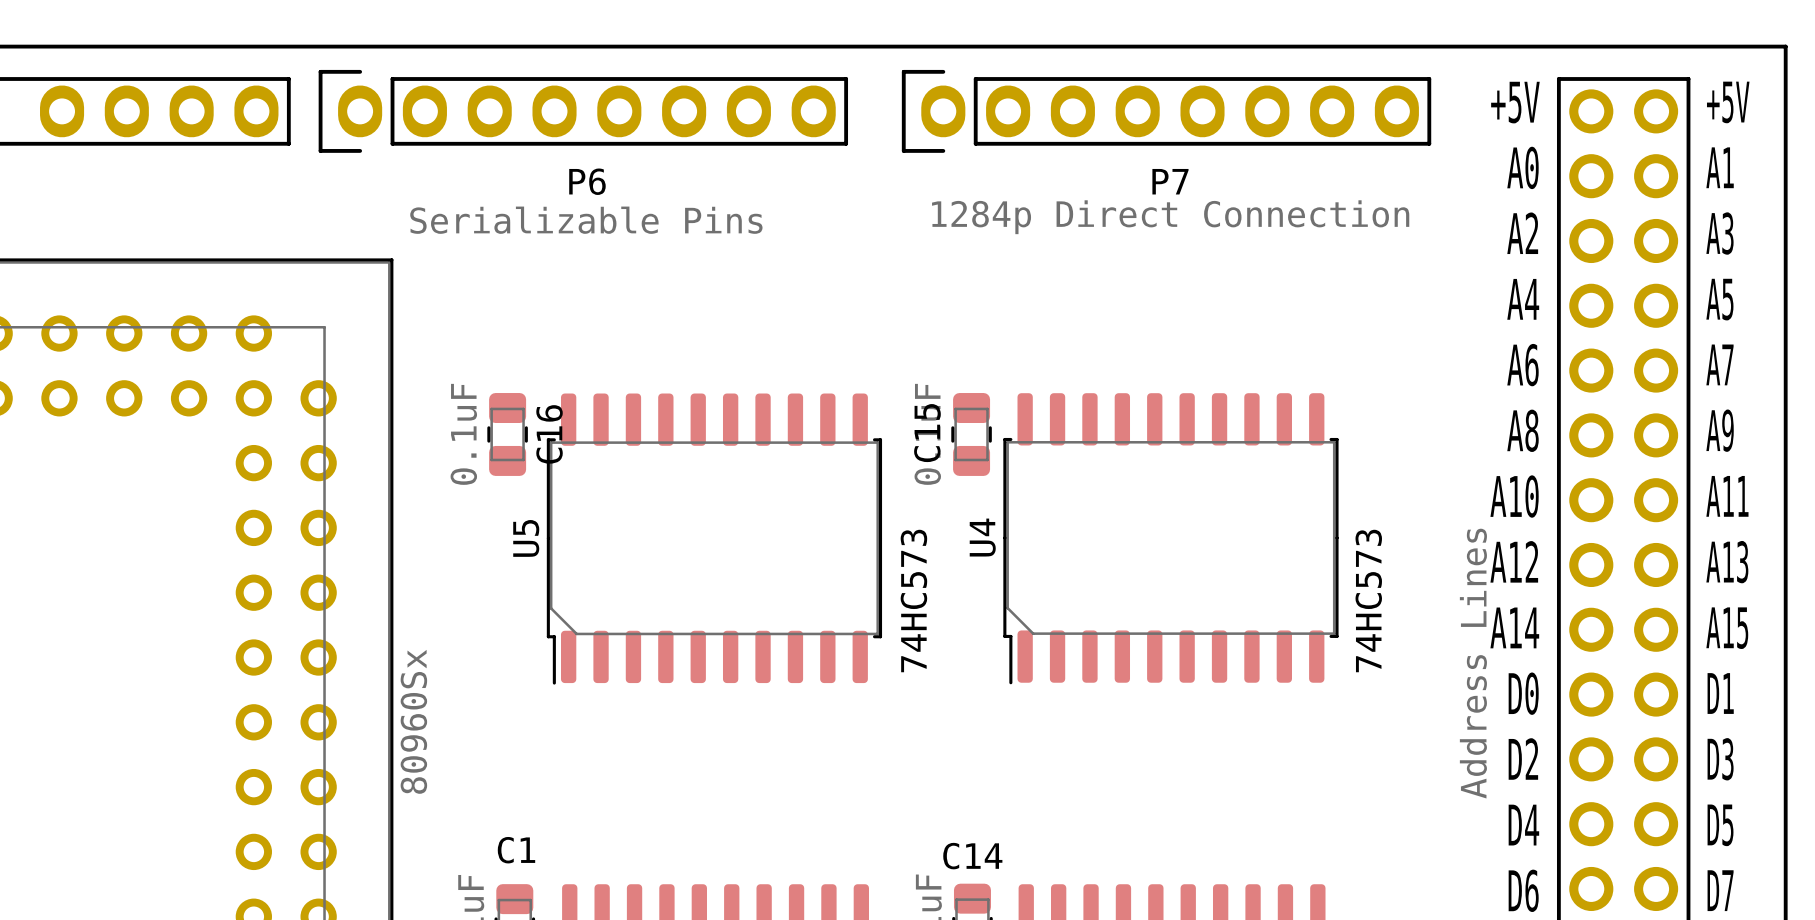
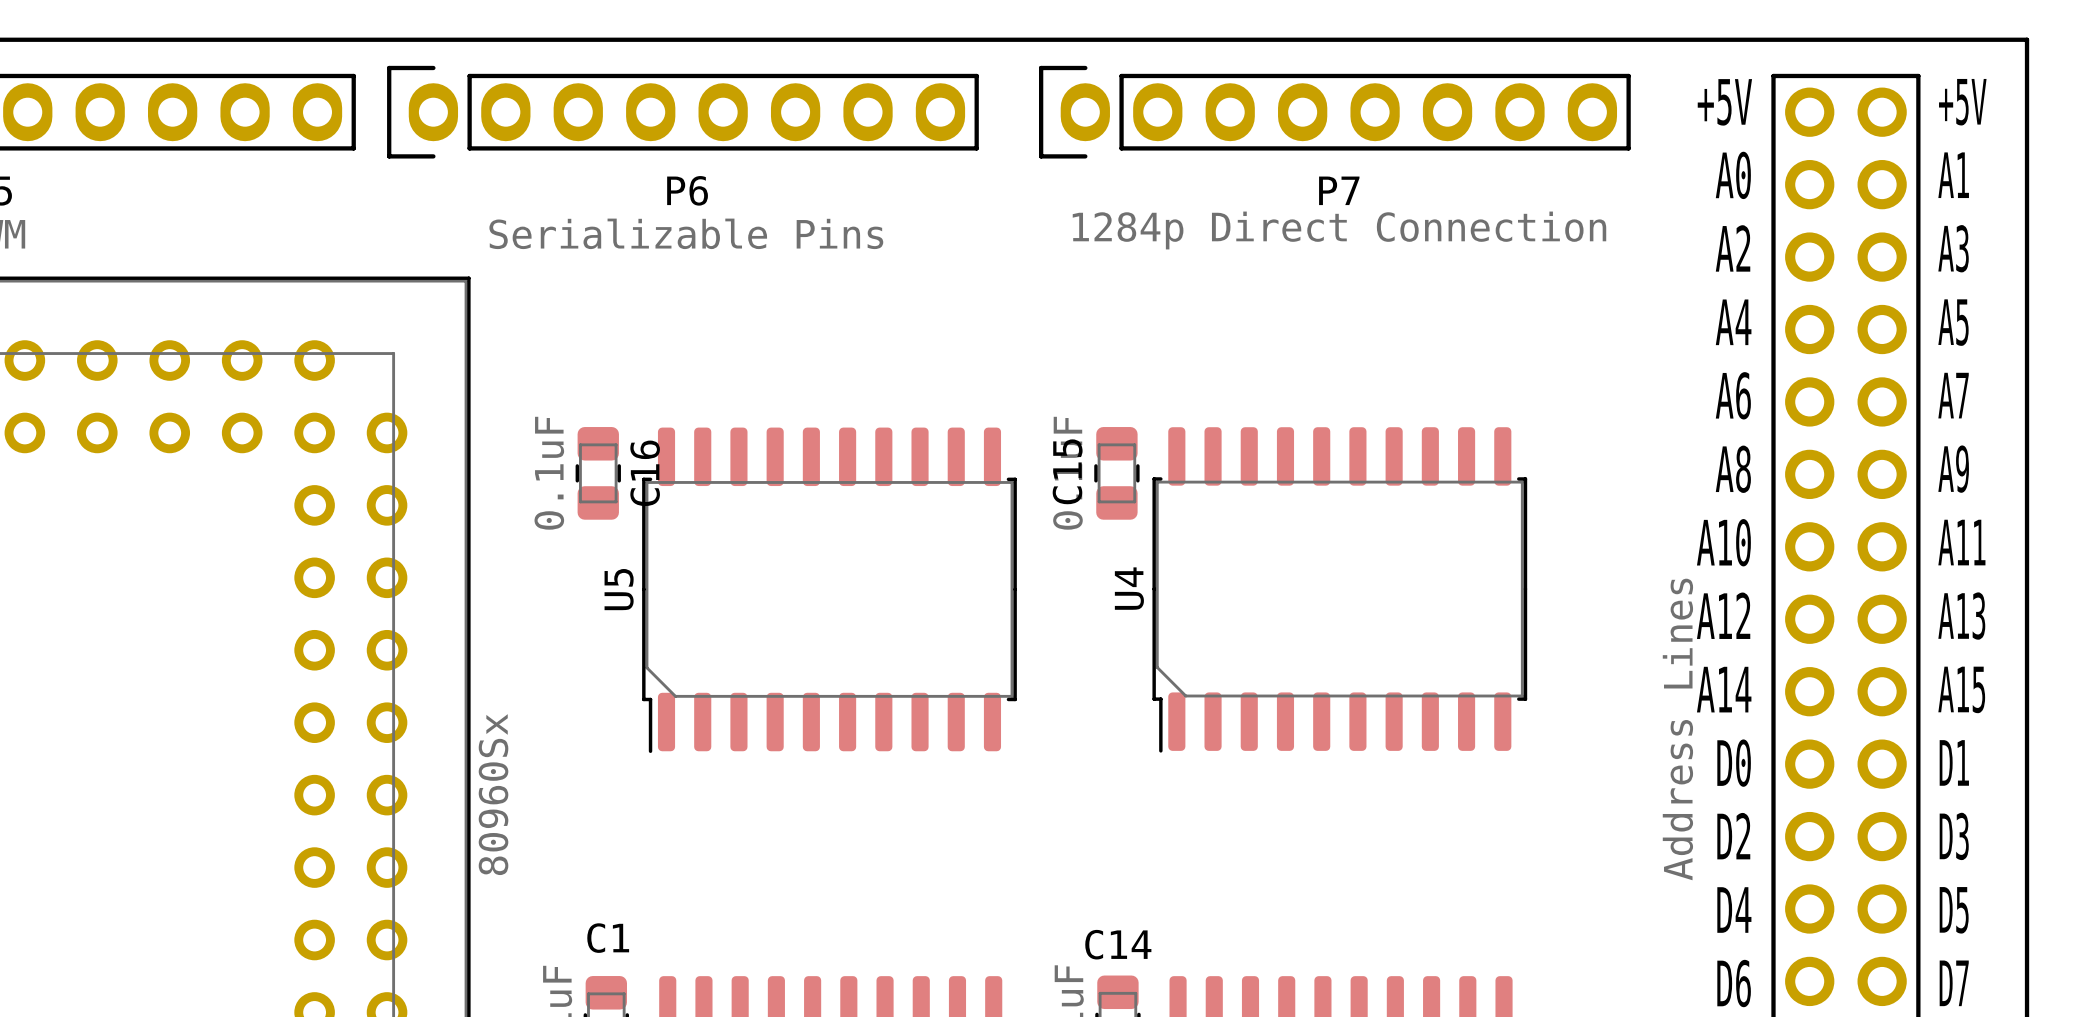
U5 value: 74HC573 (913, 601) -> none
U4 value: 74HC573 (1368, 601) -> none

